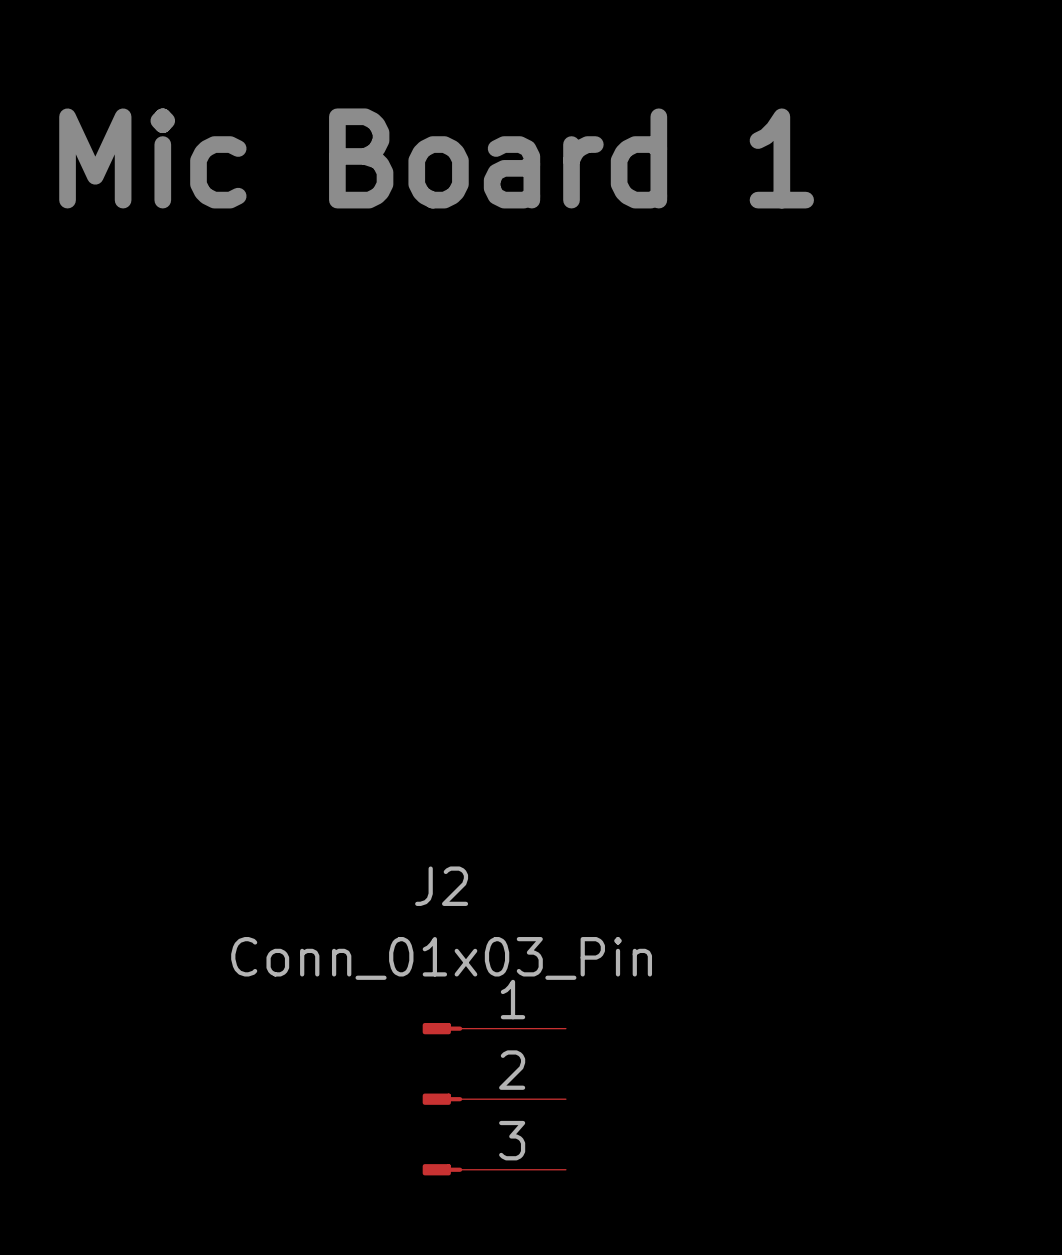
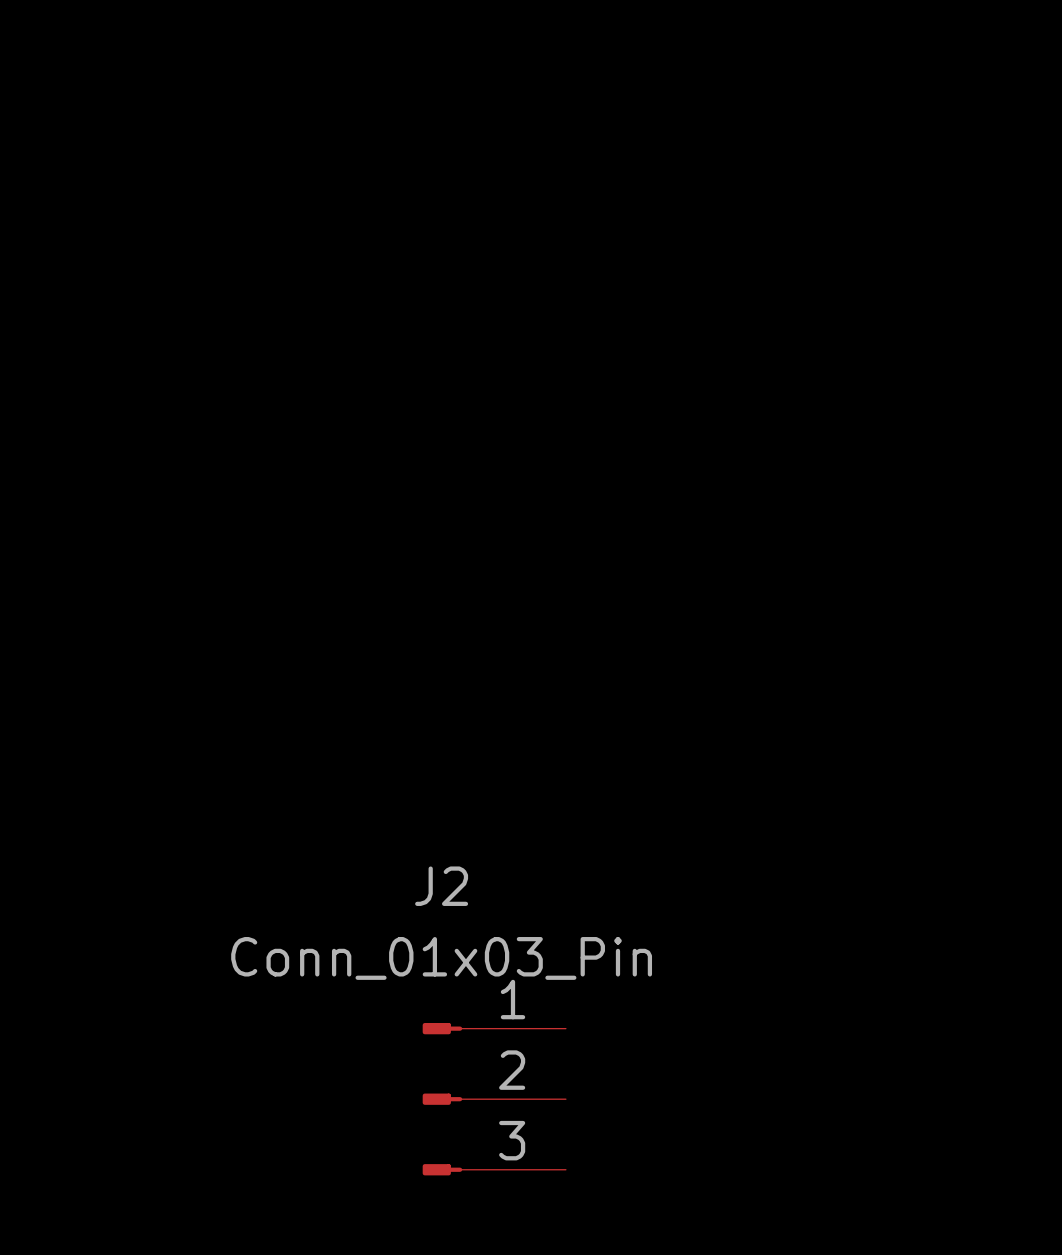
text: Mic Board 1 (436, 158) -> none

